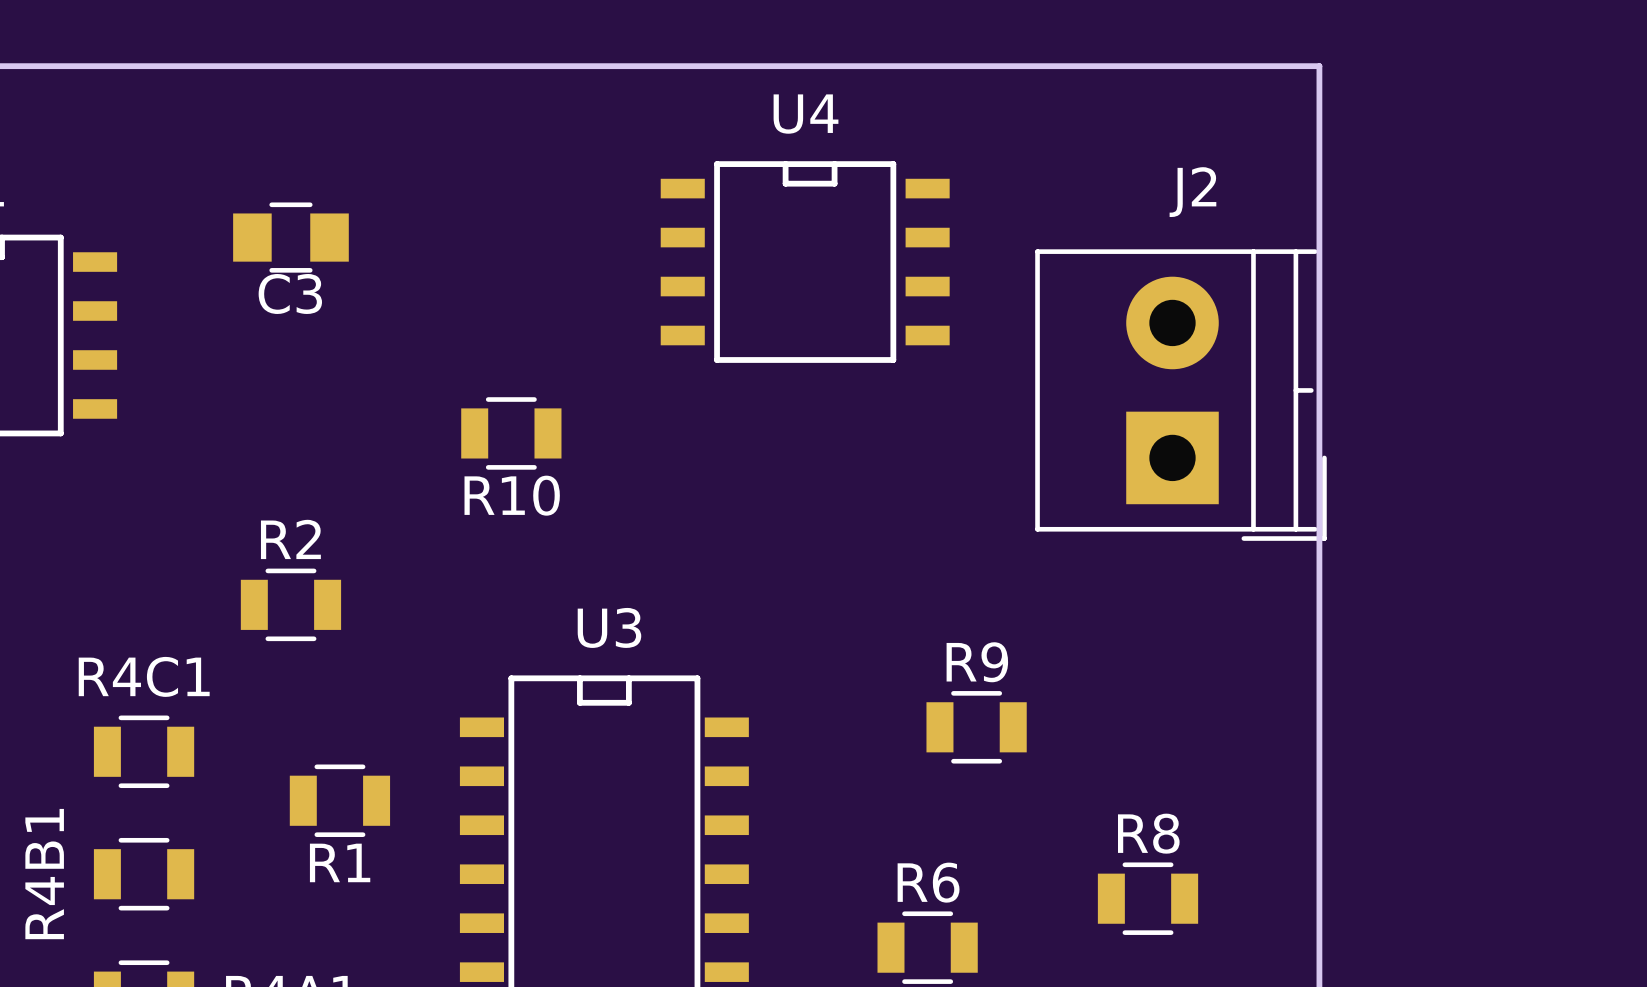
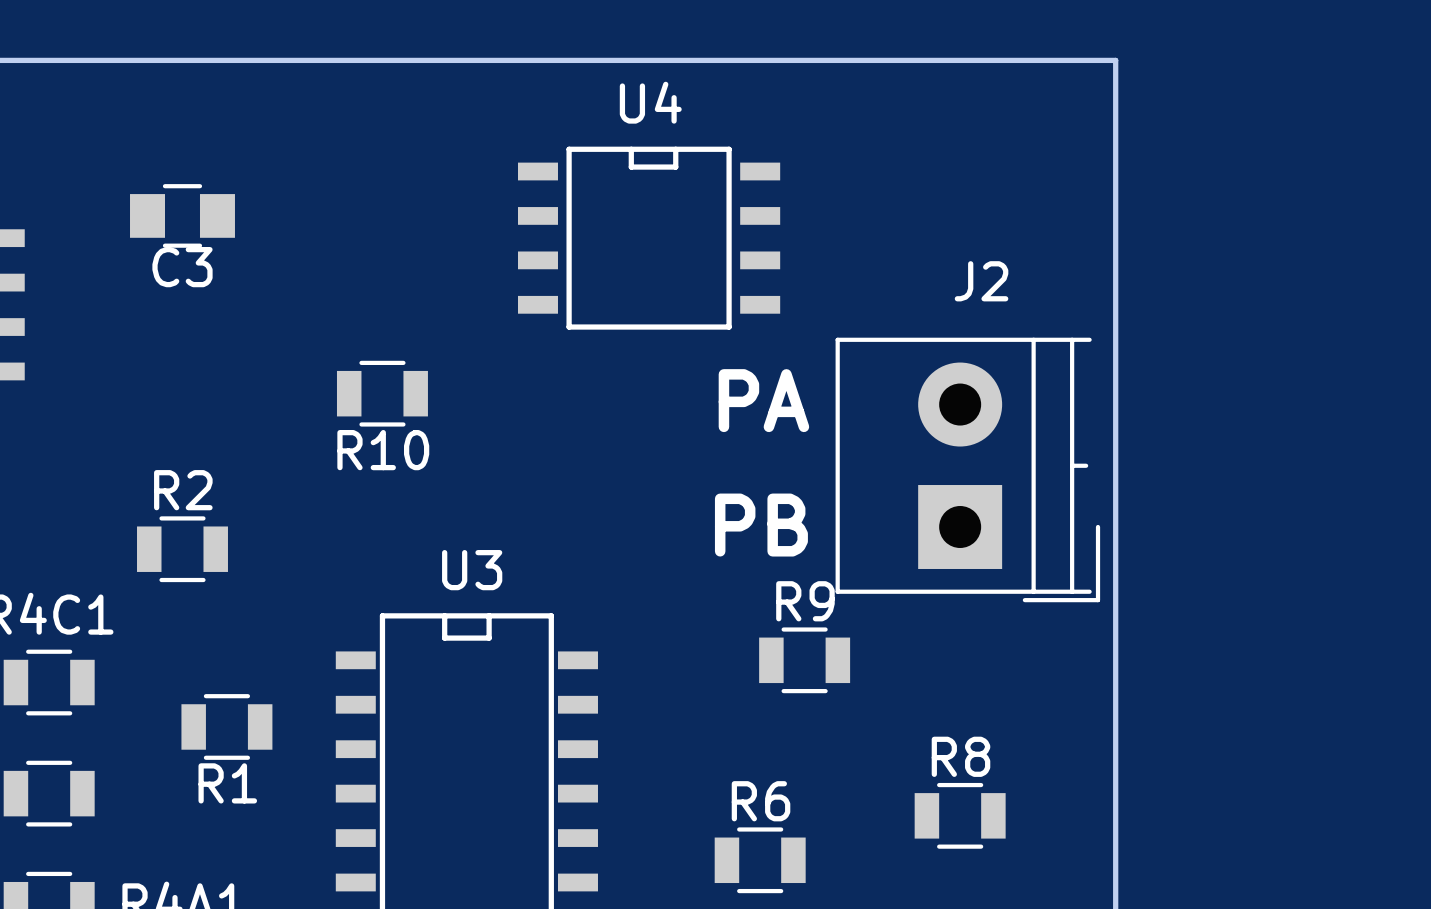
J2 position: (1180, 395) -> (967, 469)
text: none -> PA (763, 400)
text: none -> PB (761, 525)

